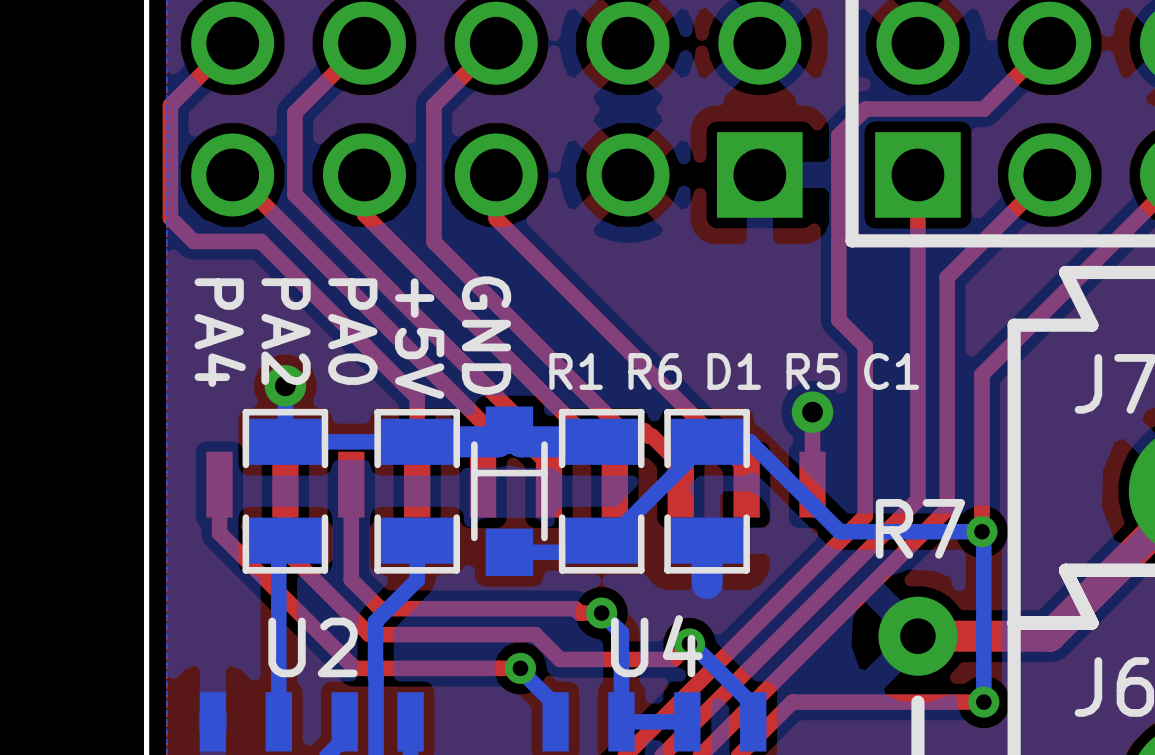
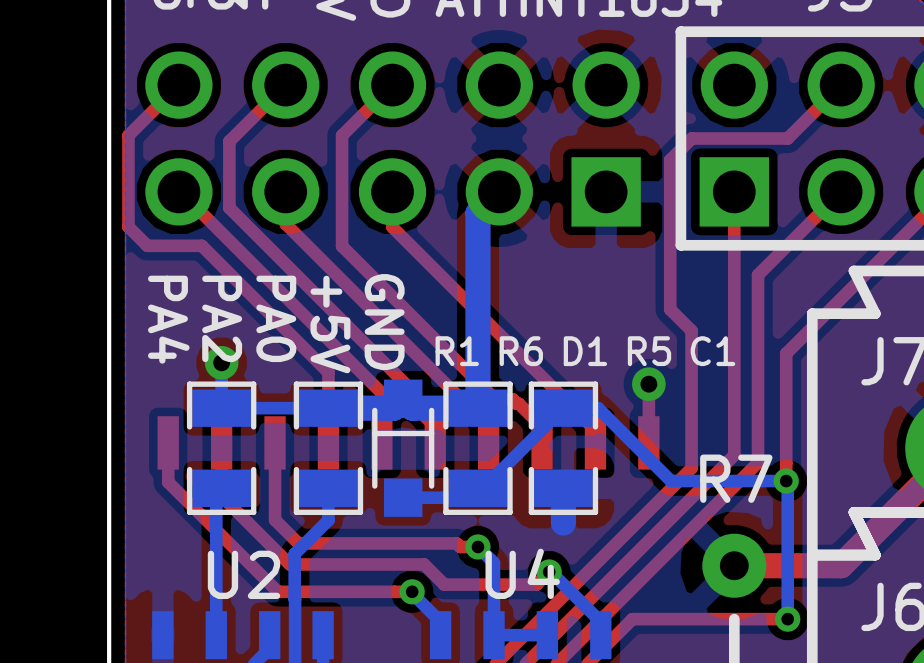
bottom track: none -> (499, 191) (477, 213) (477, 408)

